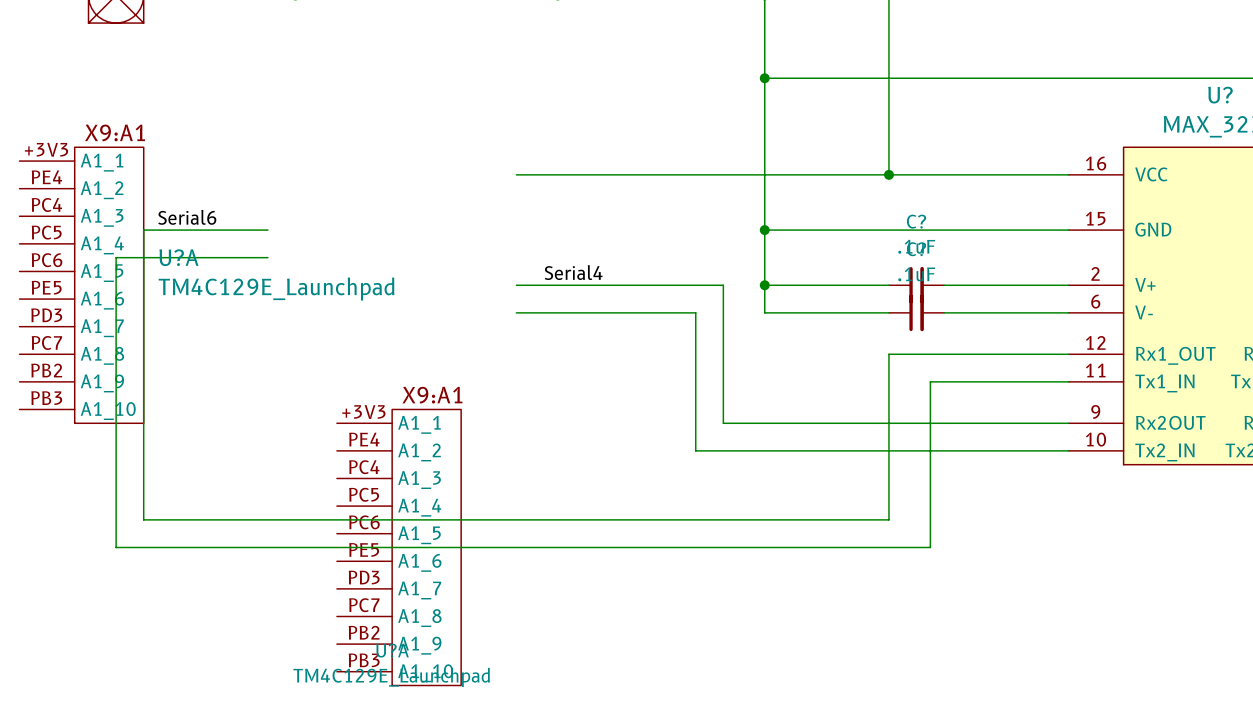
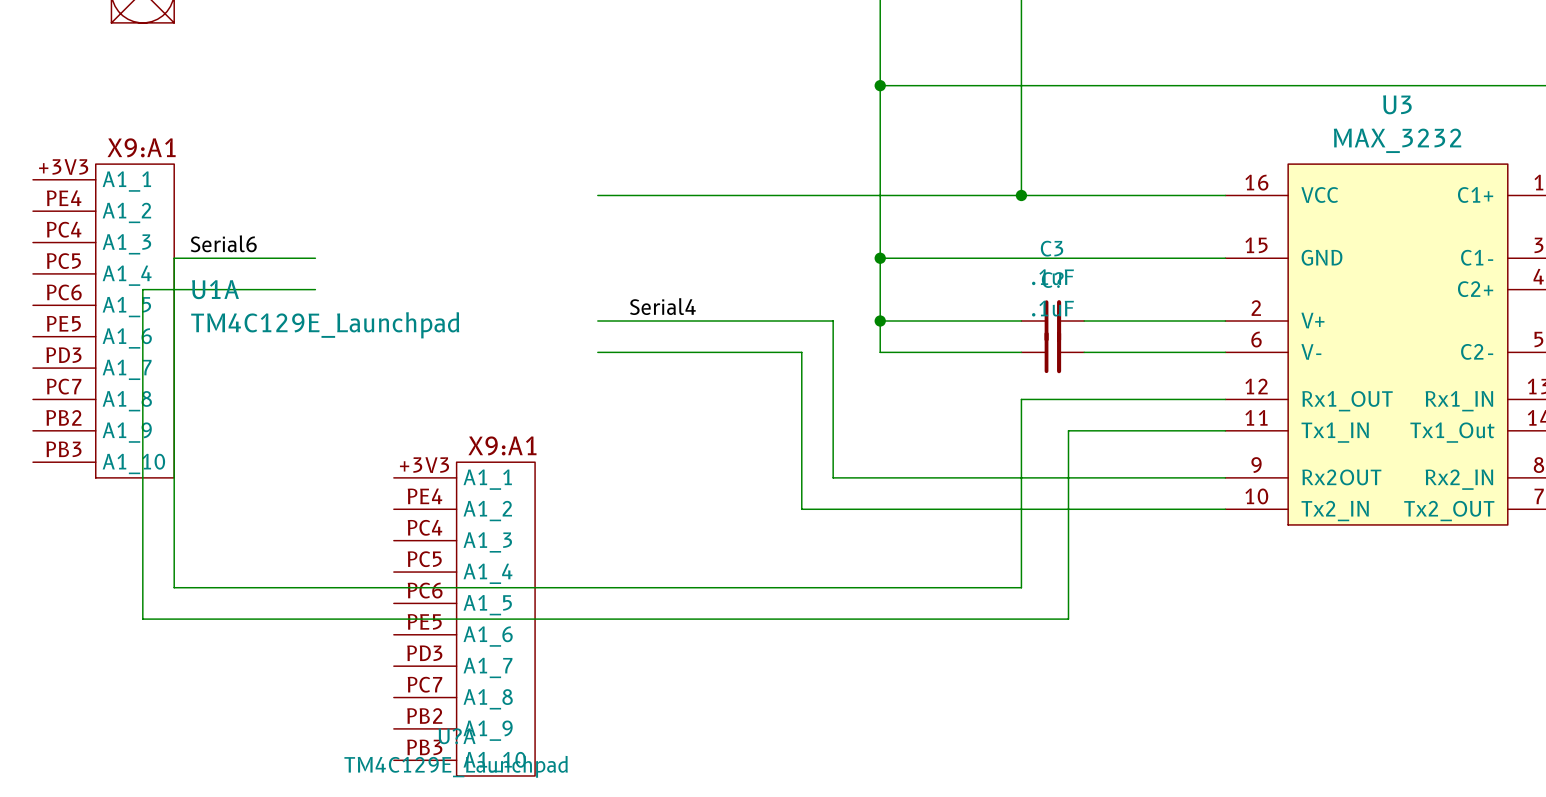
U? name: U? (1220, 95) -> U3 (1397, 104)
C? name: C? (916, 221) -> C3 (1052, 248)
U?A name: U?A (178, 257) -> U1A (215, 289)

